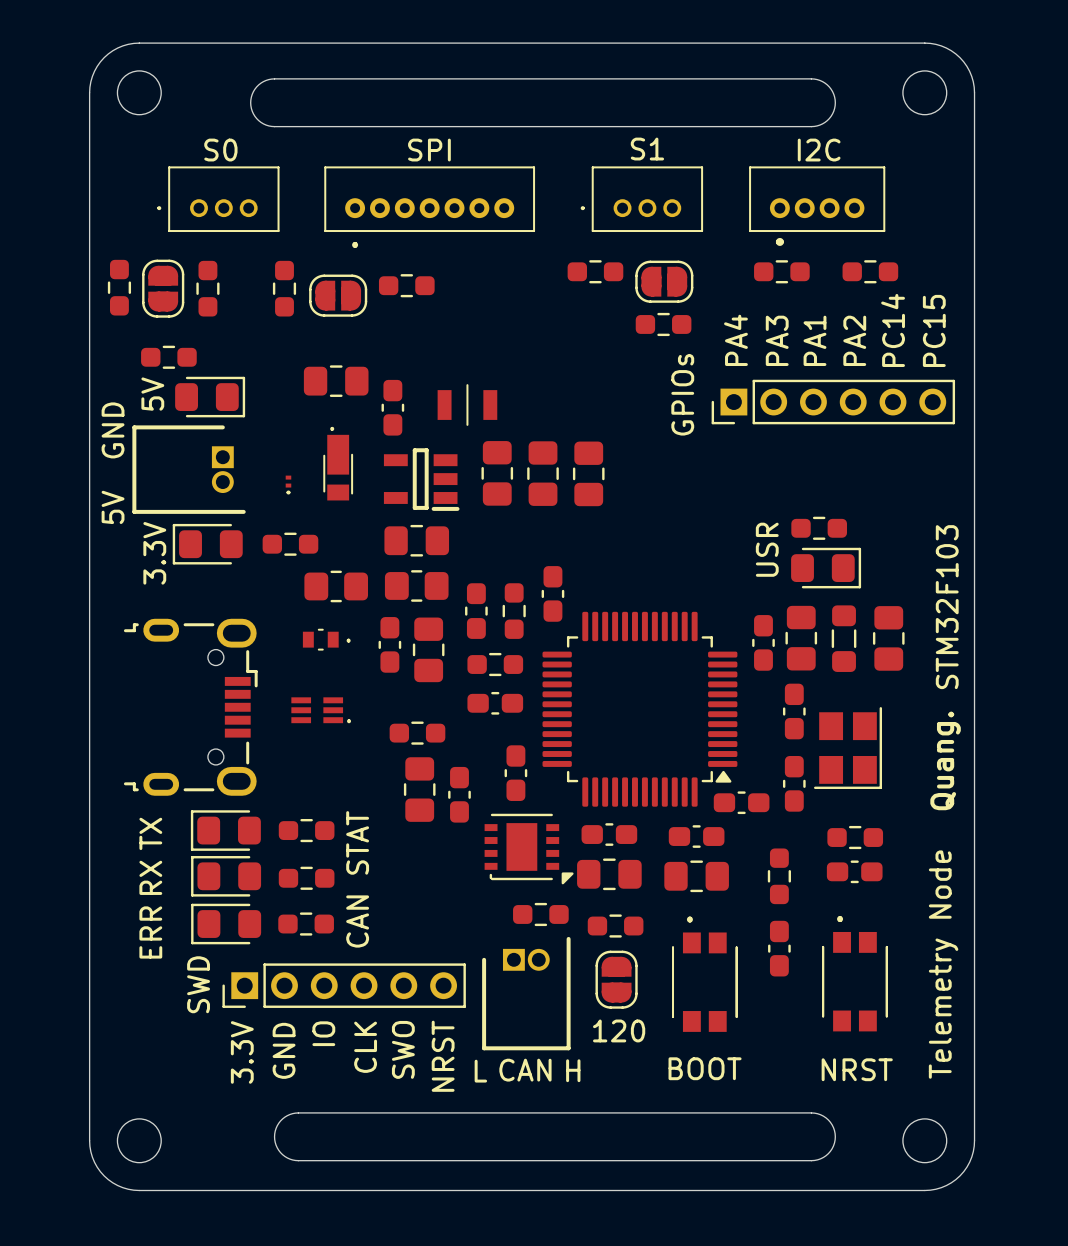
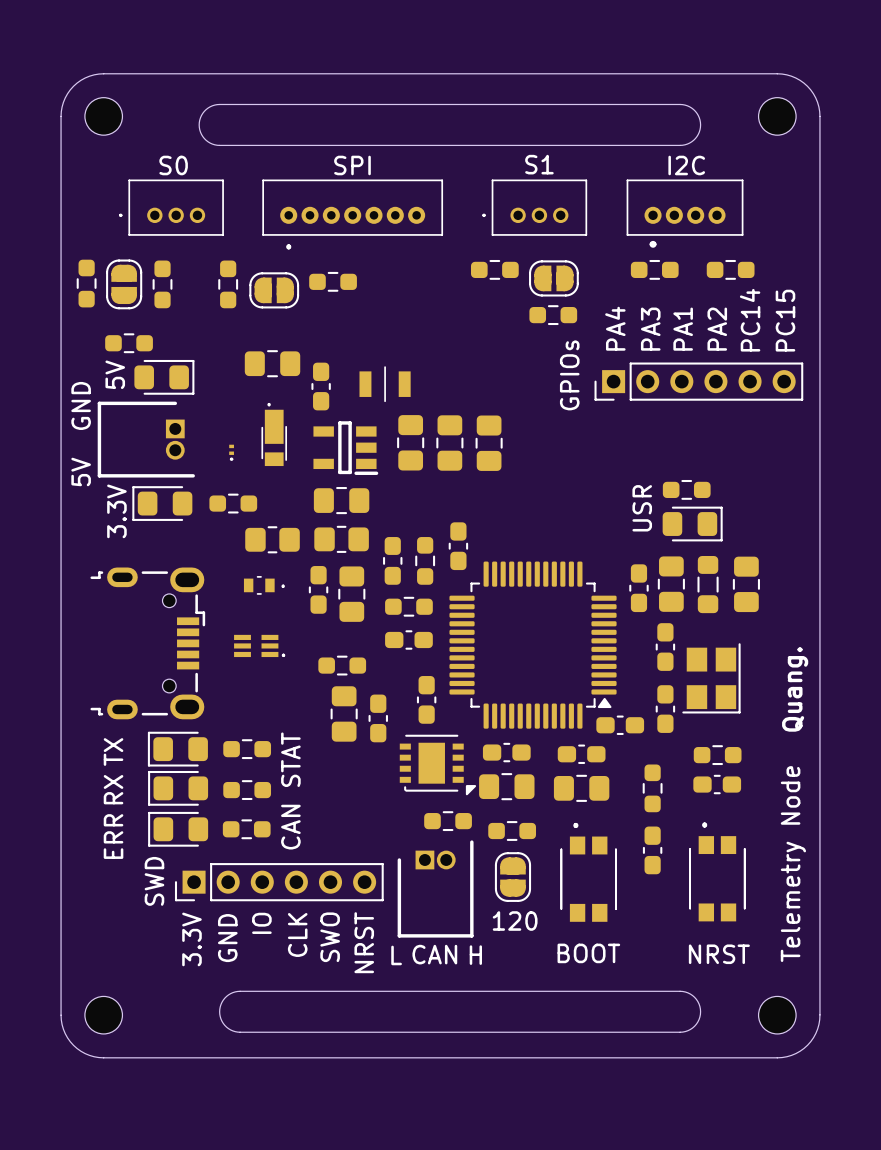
text: STM32F103 (947, 607) -> none

